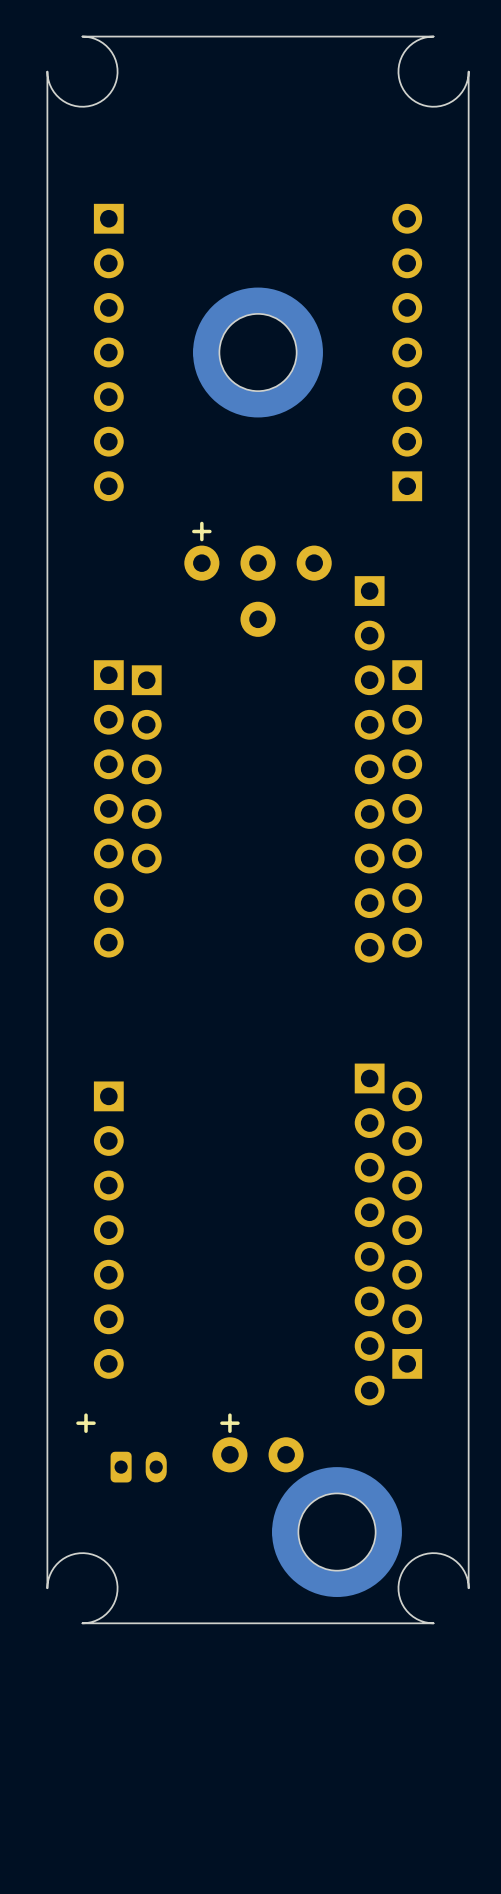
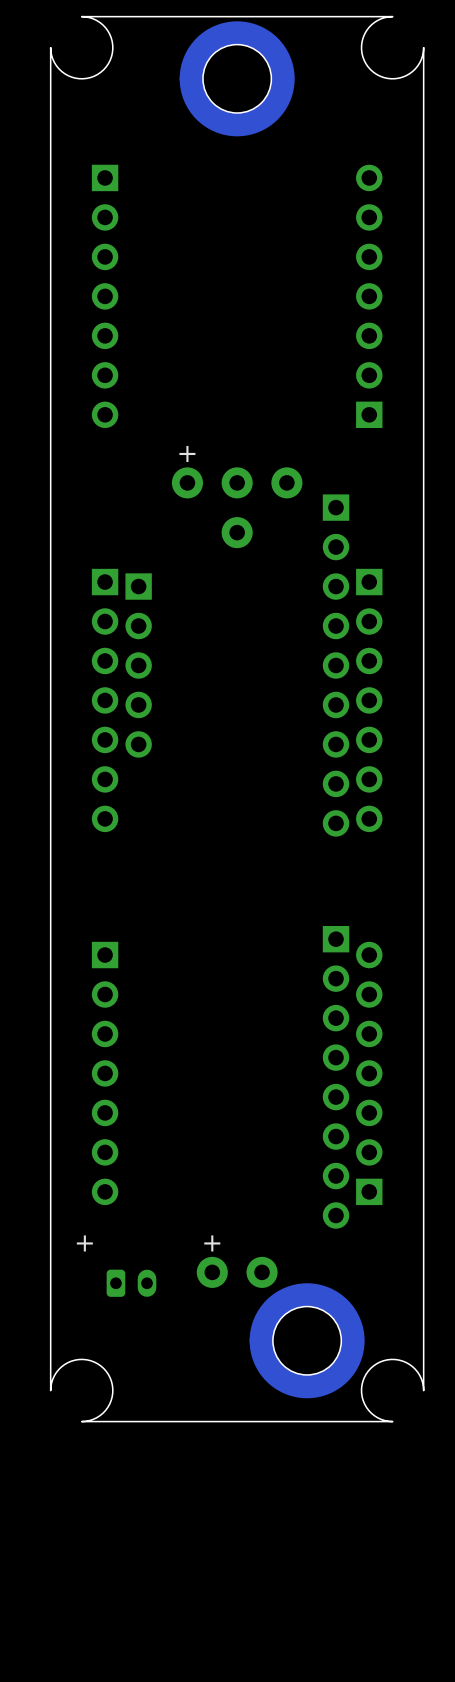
part position: (258, 352) -> (237, 78)

